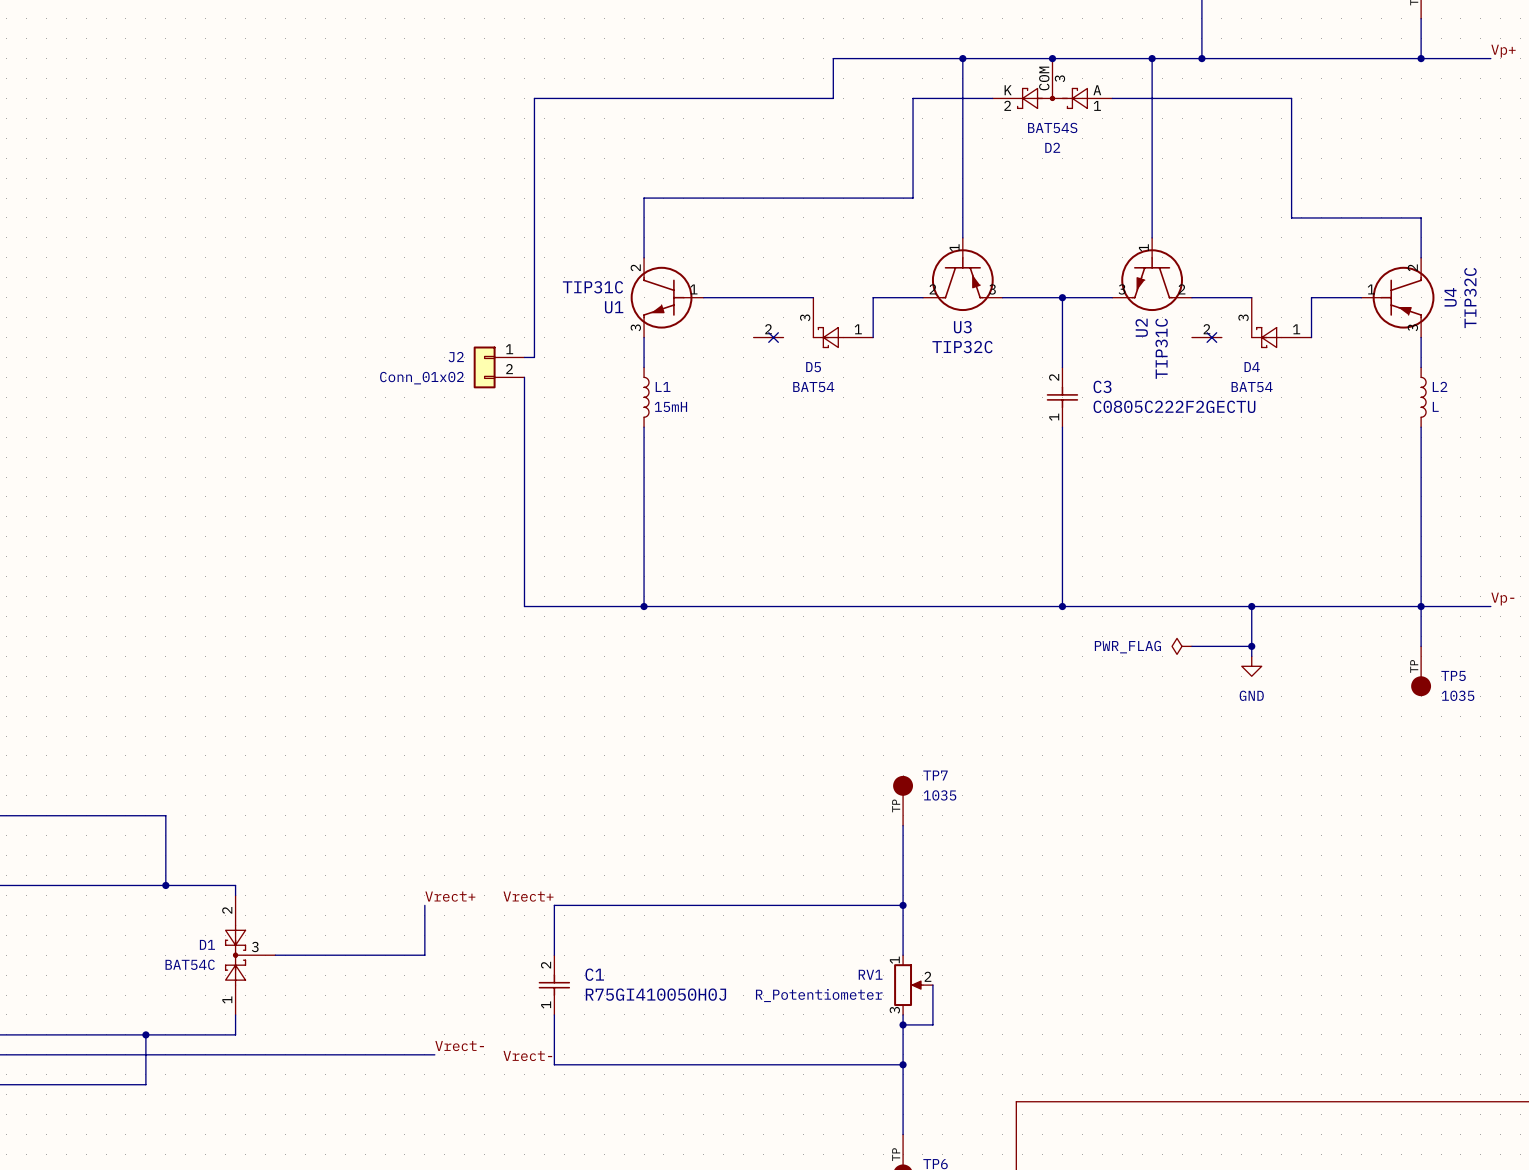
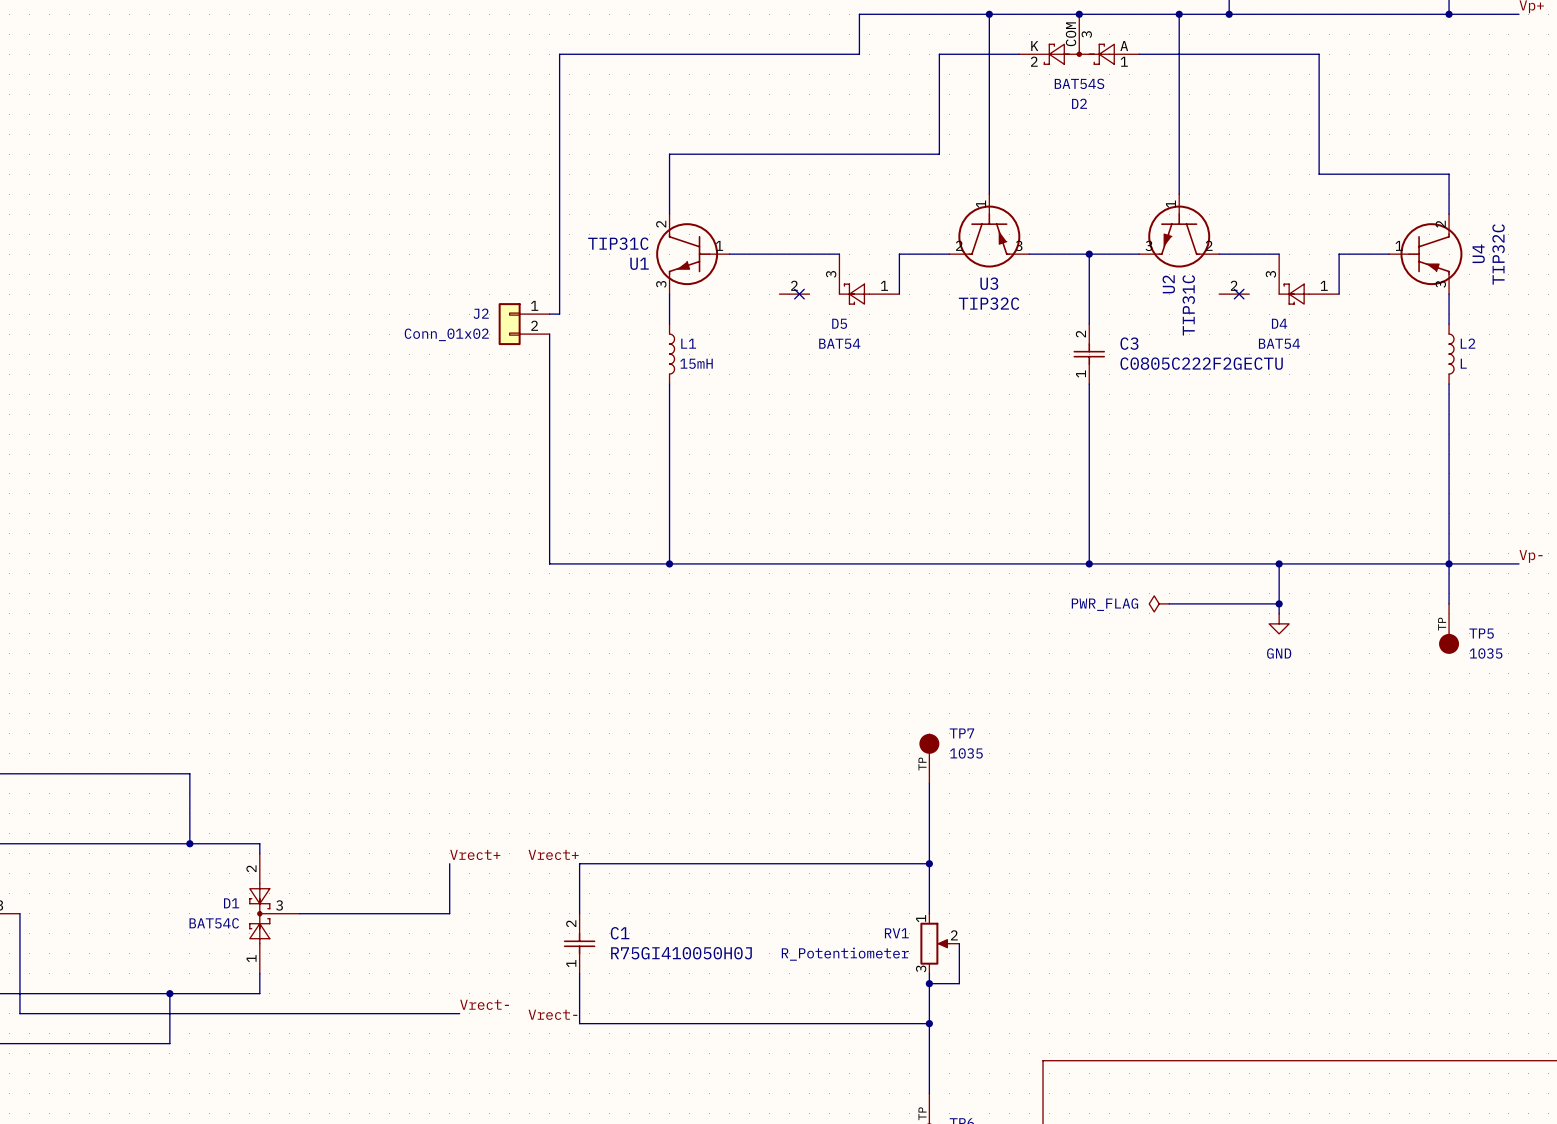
wire: none -> (1169, 603) (1219, 603)
power symbol position: PWR_FLAG (1182, 646) -> PWR_FLAG (1159, 603)

